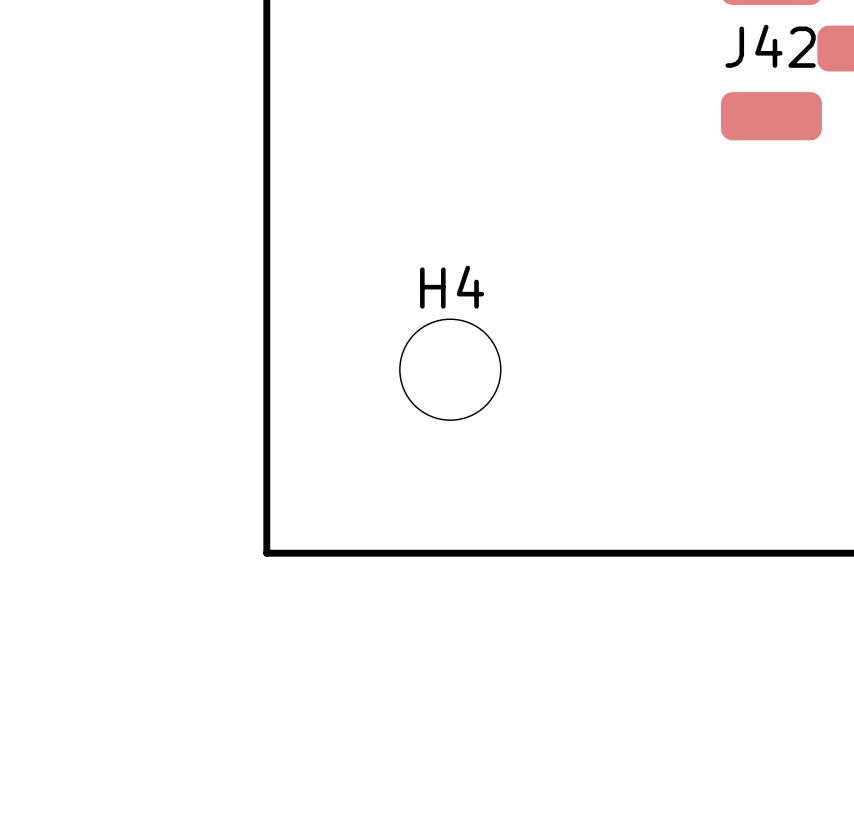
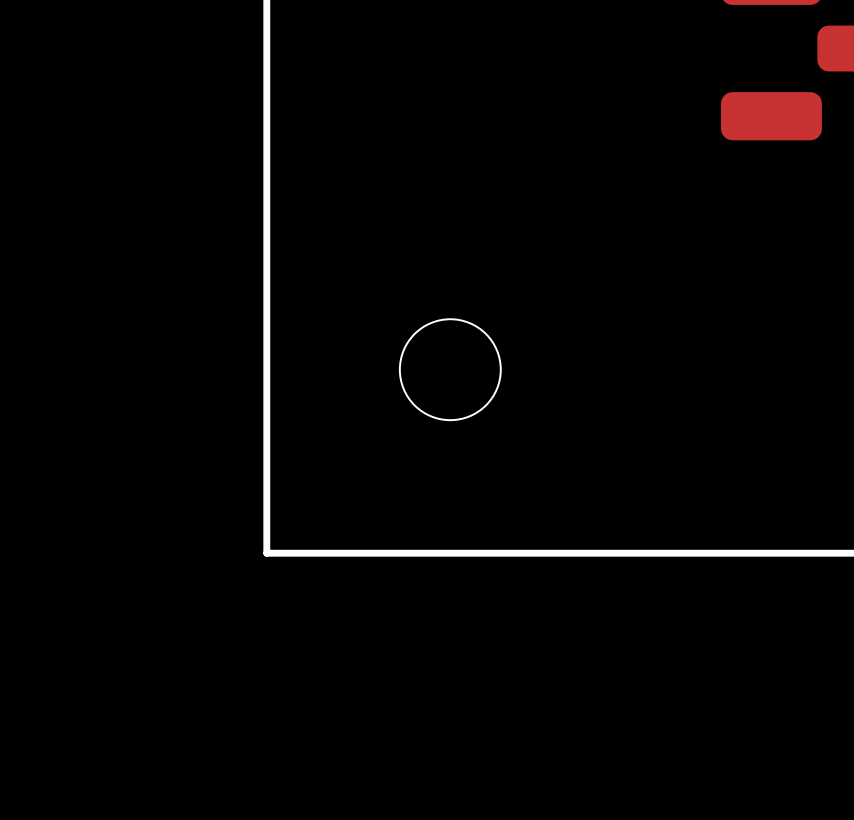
J42 name: J42 (770, 46) -> none
H4 name: H4 (452, 287) -> none

